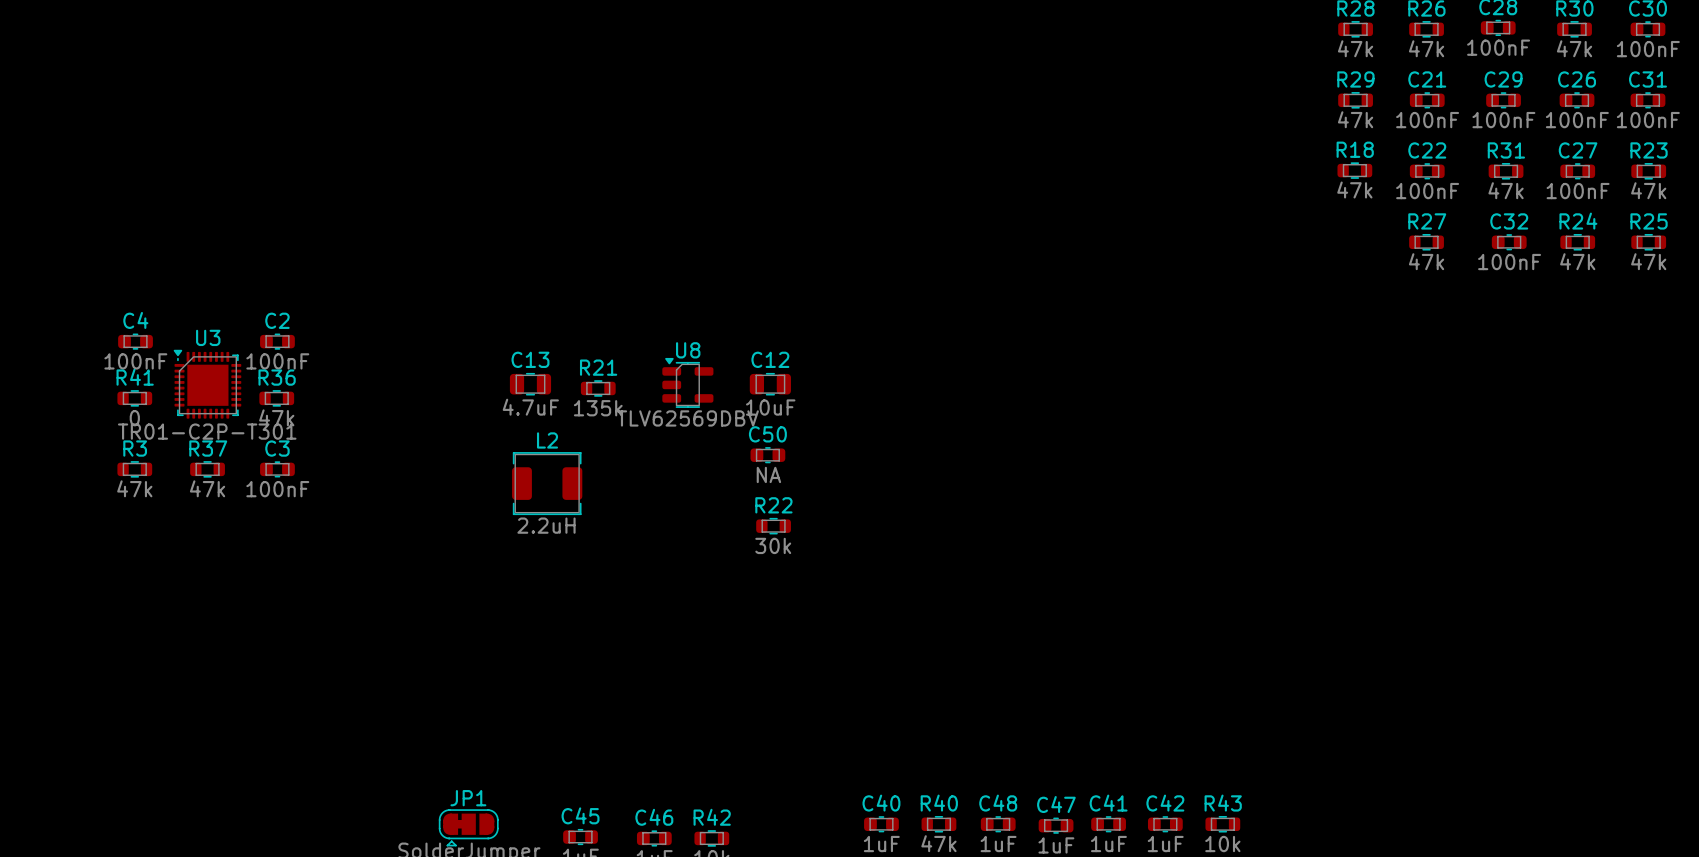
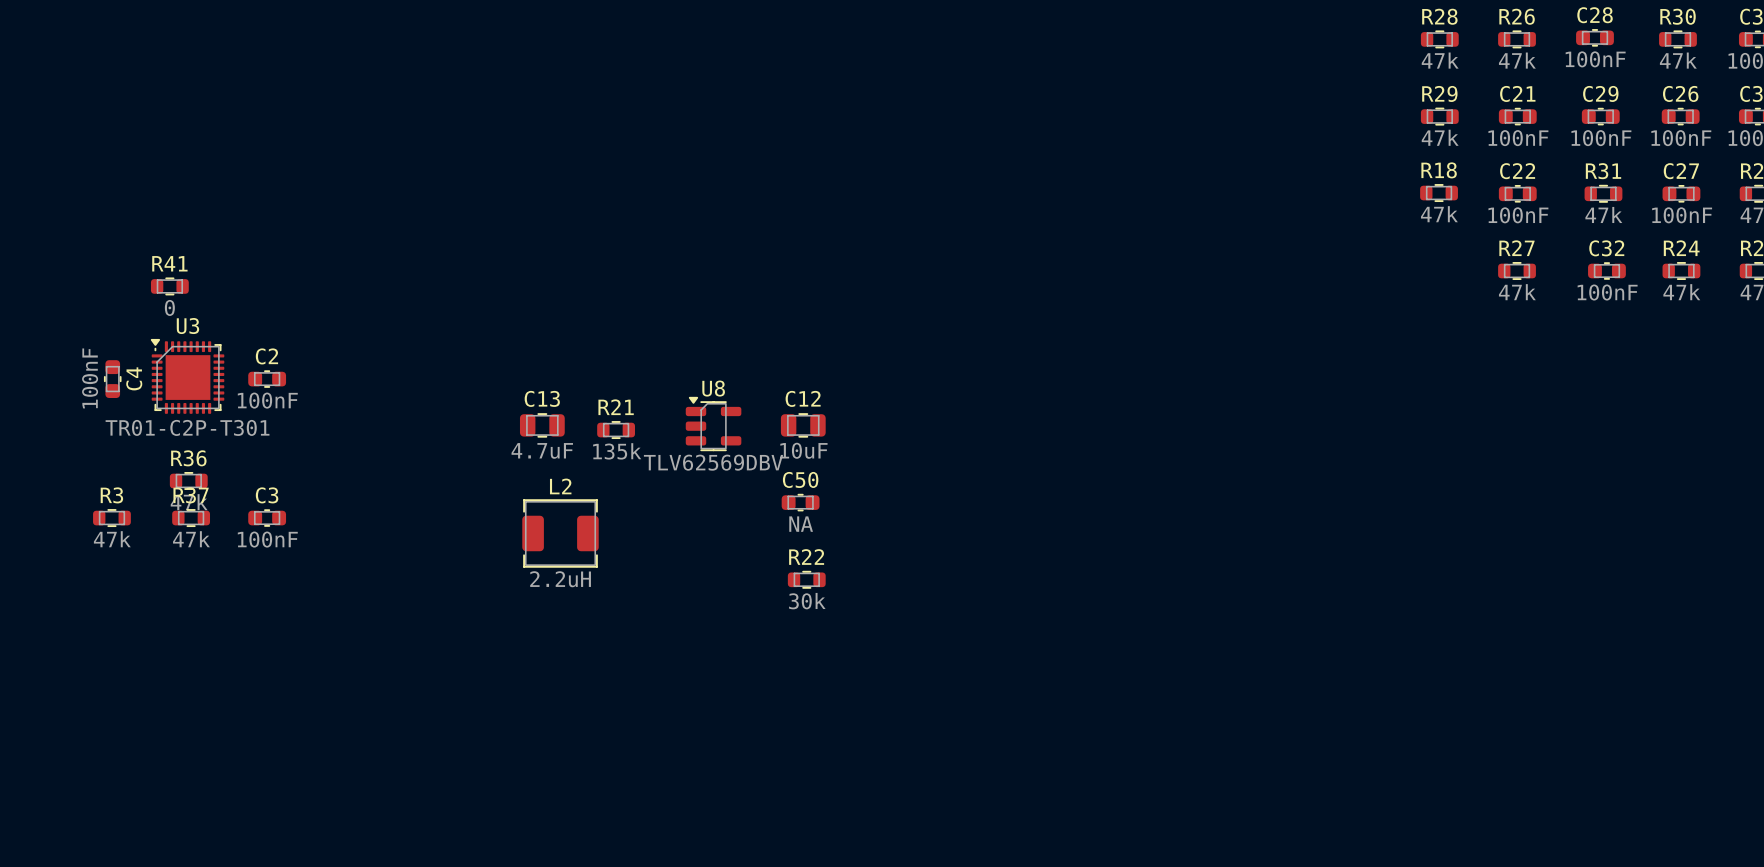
C4 rotation: 0° (135, 341) -> 90° clockwise (112, 379)
U3 position: (207, 384) -> (187, 376)
R41 position: (134, 398) -> (169, 286)
R36 position: (276, 398) -> (188, 480)

